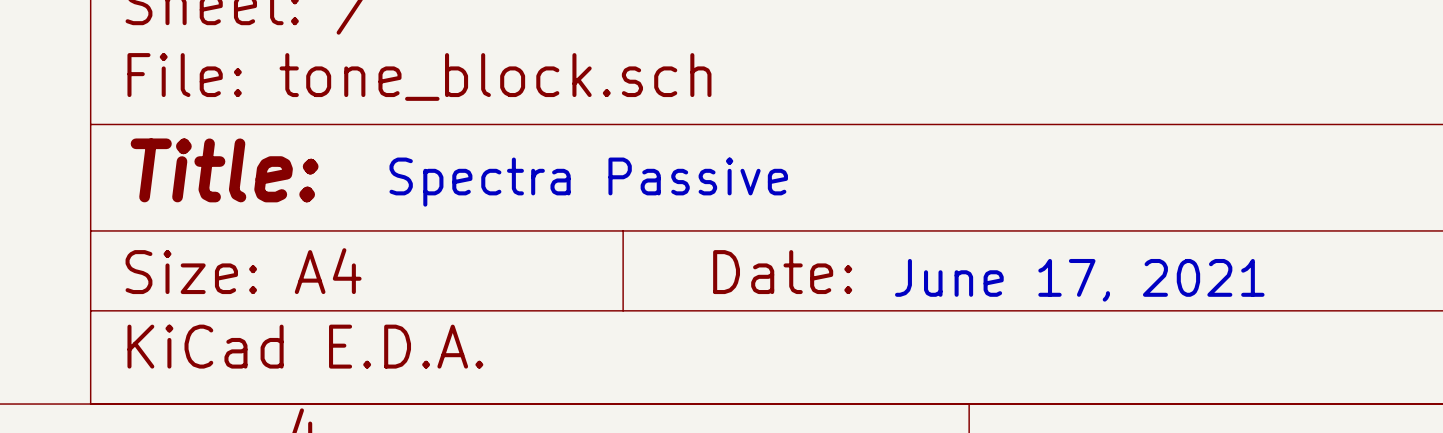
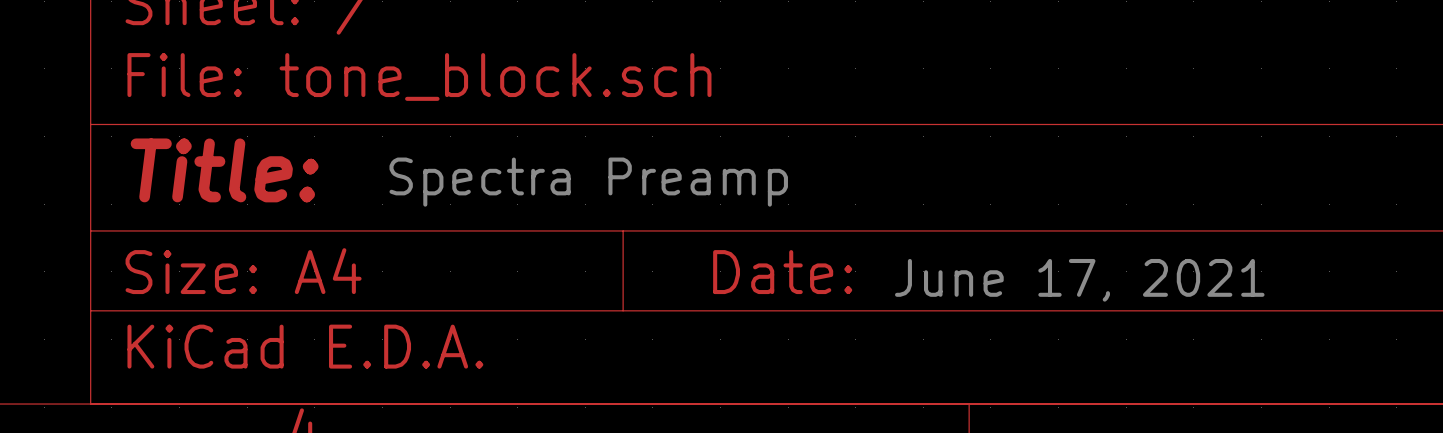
text: Spectra Passive (588, 182) -> Spectra Preamp (588, 182)

